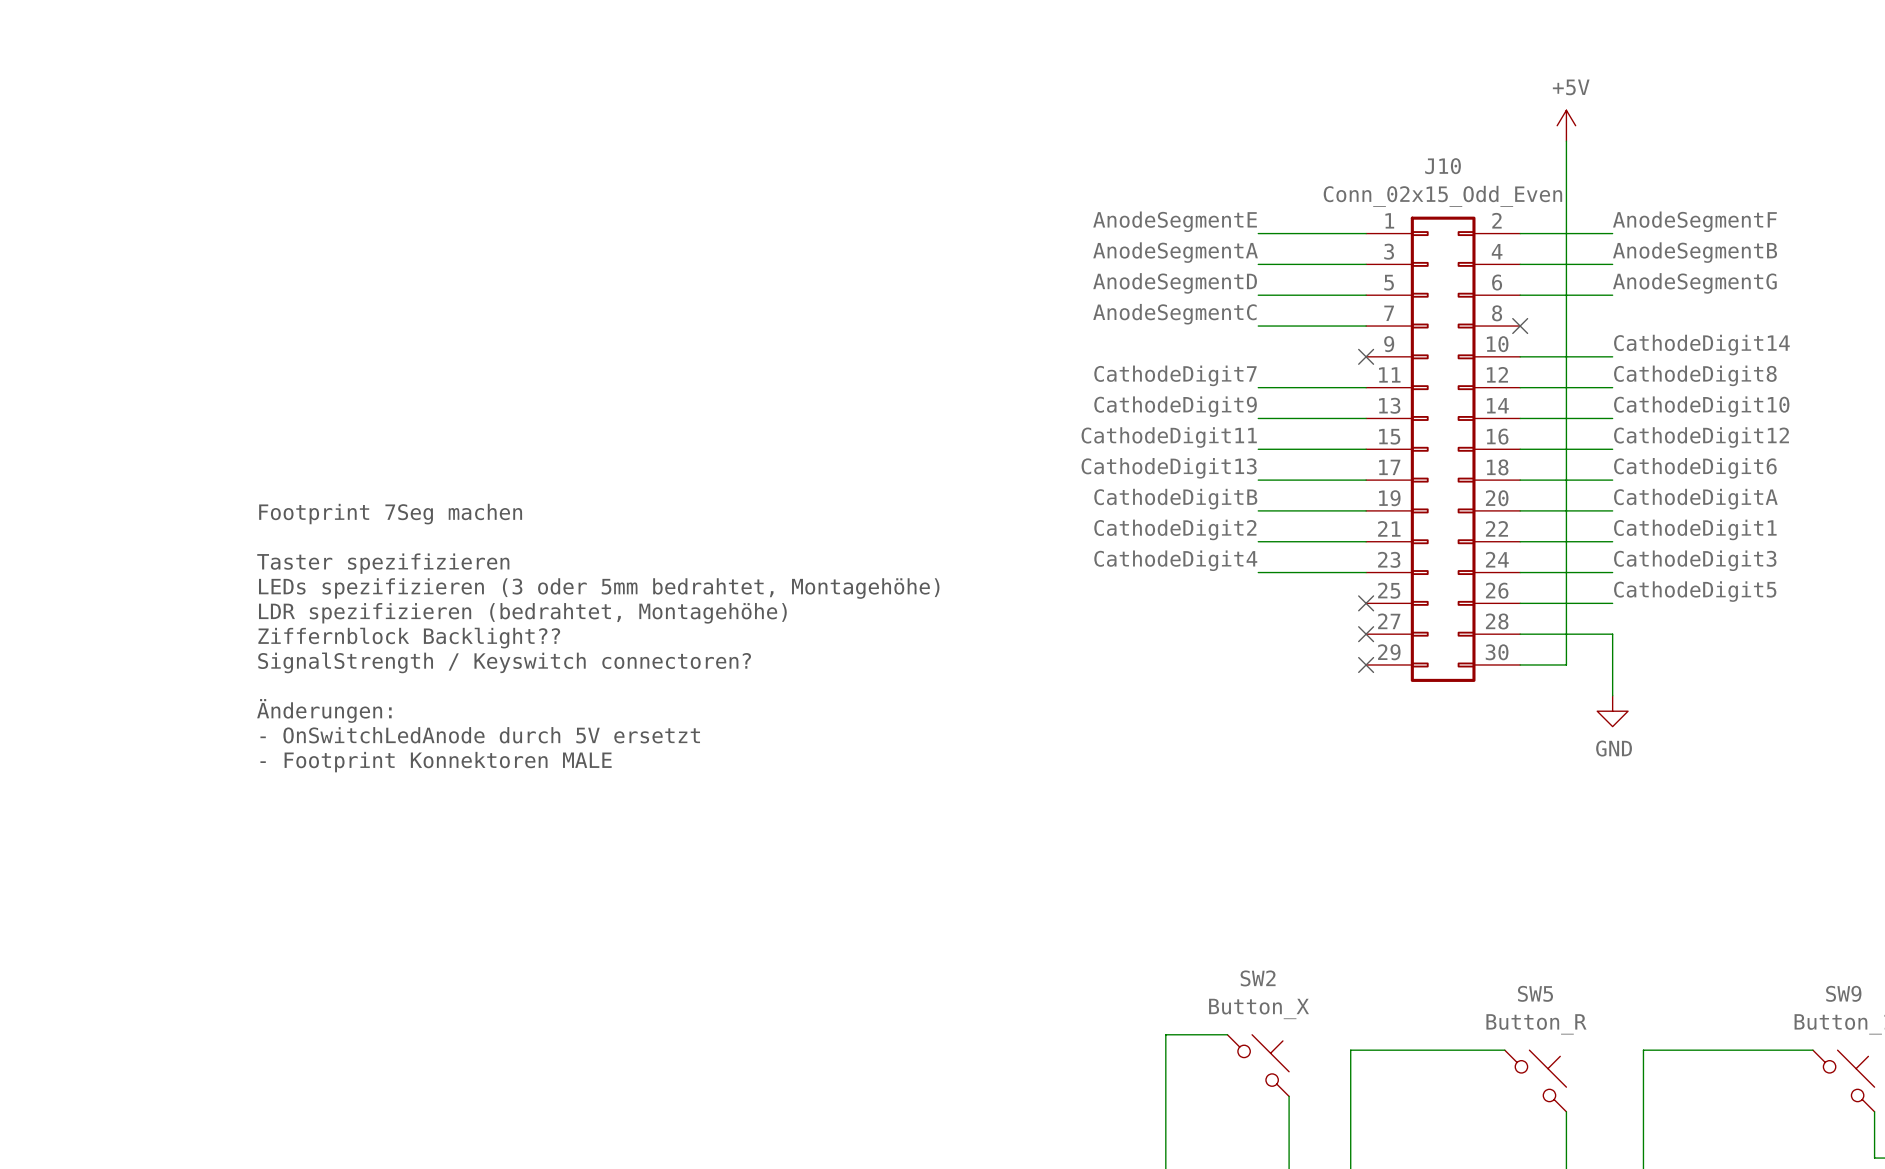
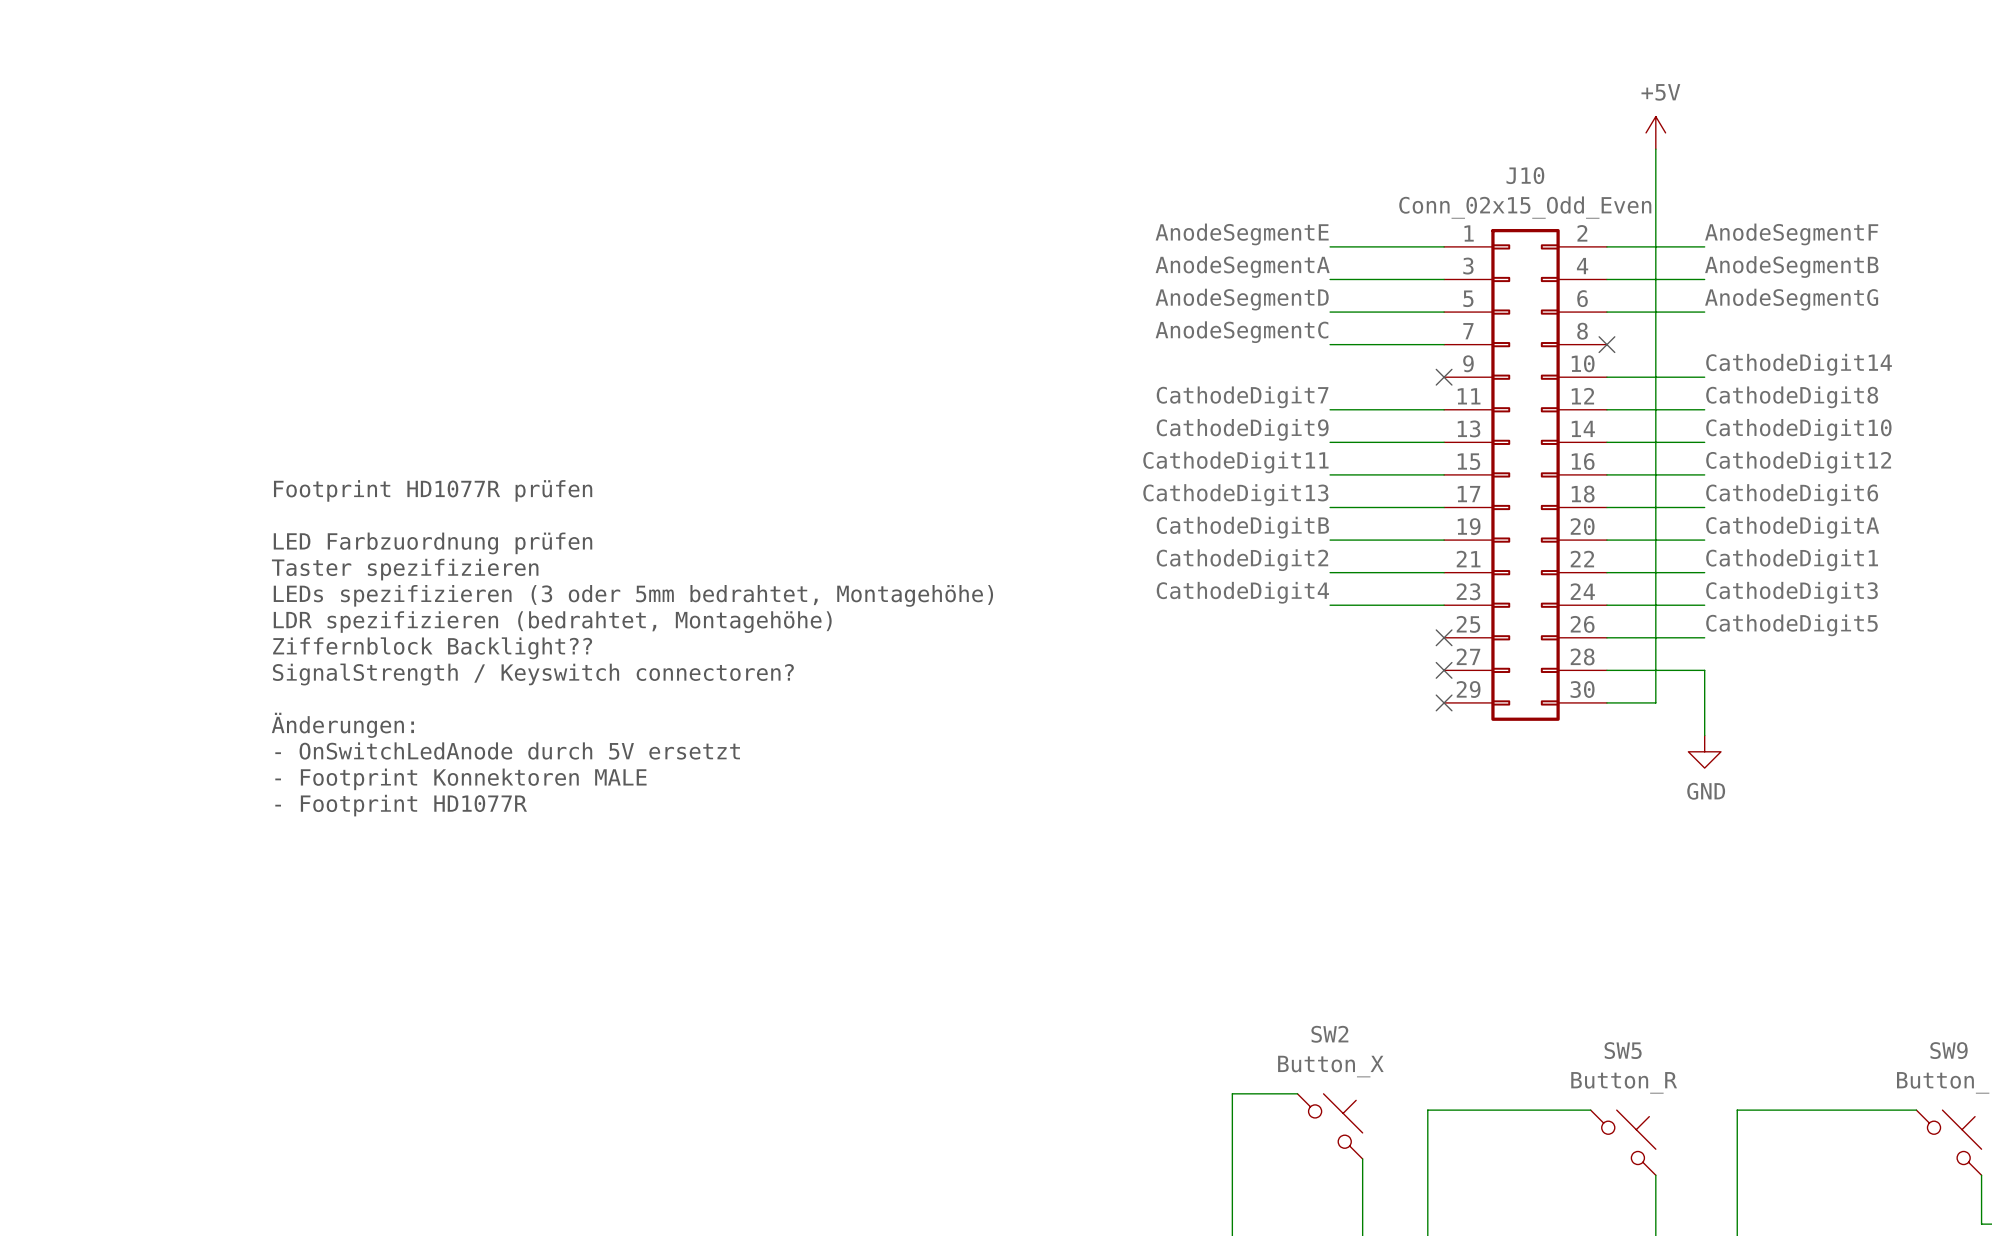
text: none -> Footprint HD1077R prüfen (433, 490)
text: Footprint 7Seg machen (390, 514) -> LED Farbzuordnung prüfen (432, 543)
text: none -> Taster spezifizieren (405, 569)
text: Taster spezifizieren (383, 563) -> LEDs spezifizieren (3 oder 5mm bedrahtet, Montagehöhe) (633, 595)
text: LEDs spezifizieren (3 oder 5mm bedrahtet, Montagehöhe) (599, 588) -> LDR spezifizieren (bedrahtet, Montagehöhe) (552, 622)
text: LDR spezifizieren (bedrahtet, Montagehöhe) (522, 613) -> Ziffernblock Backlight?? (432, 648)
text: Ziffernblock Backlight?? (409, 638) -> SignalStrength / Keyswitch connectoren? (533, 674)
text: SignalStrength / Keyswitch connectoren? (504, 662) -> none
text: none -> Änderungen: (342, 725)
text: Änderungen: (324, 710) -> - OnSwitchLedAnode durch 5V ersetzt (507, 750)
text: - OnSwitchLedAnode durch 5V ersetzt (480, 735) -> - Footprint Konnektoren MALE (460, 779)
text: - Footprint Konnektoren MALE (436, 762) -> - Footprint HD1077R (401, 805)

